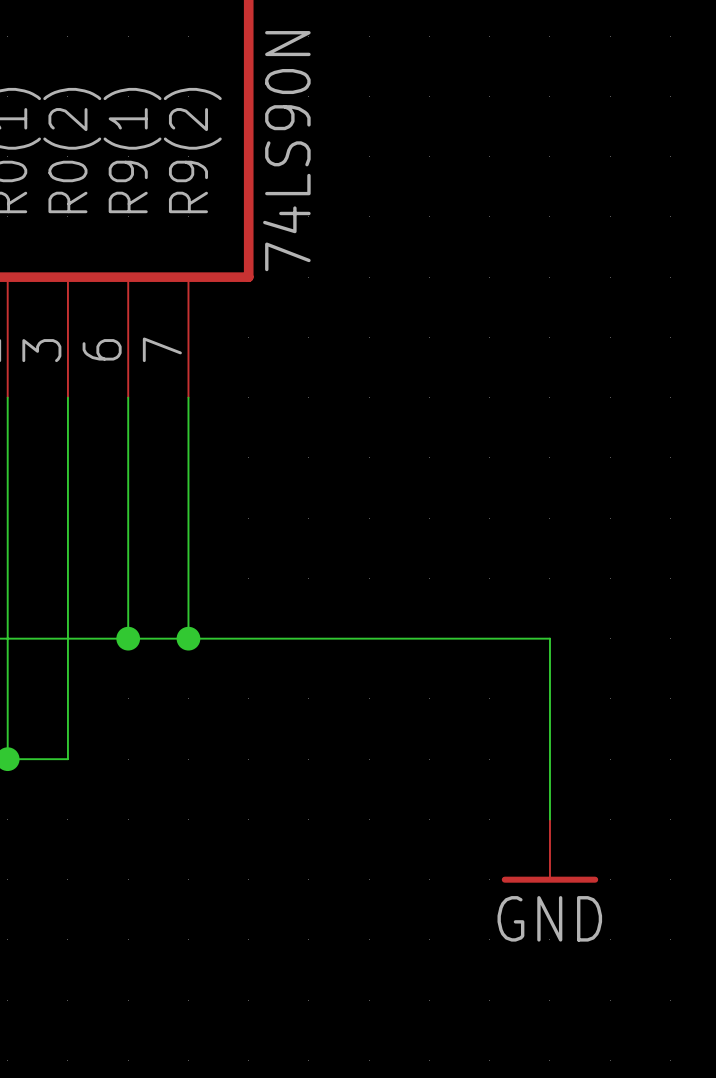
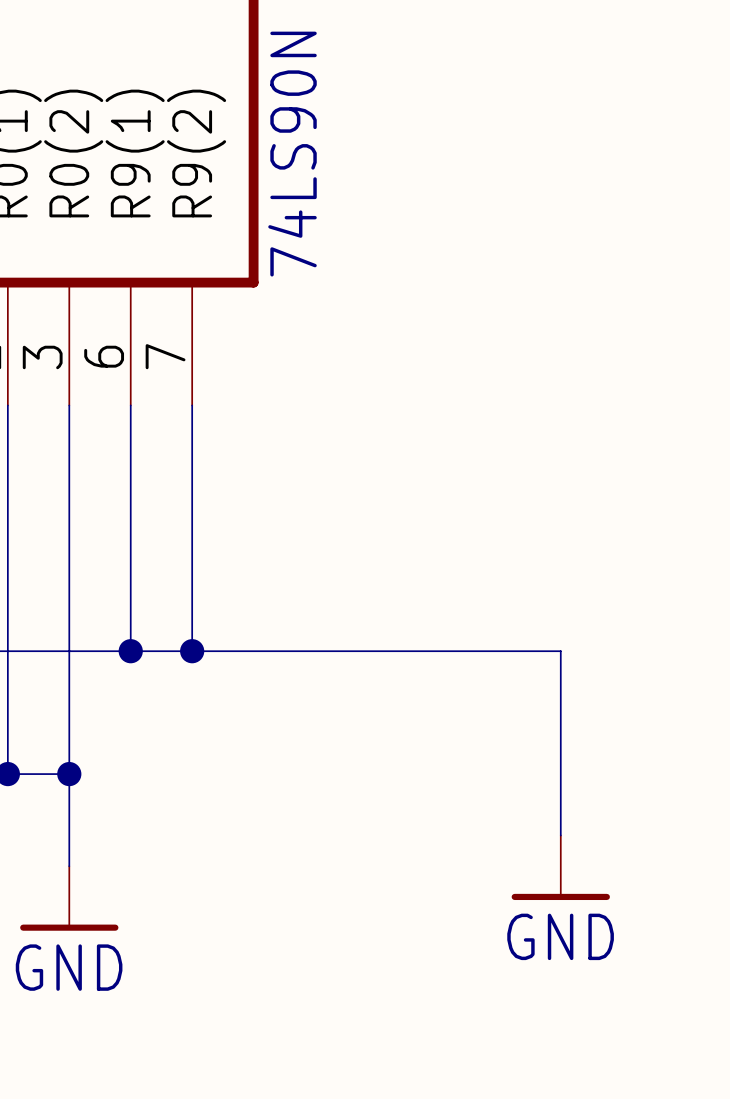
wire: none -> (69, 774) (69, 866)
junction: none -> (69, 774)
power symbol: none -> GND (69, 898)

